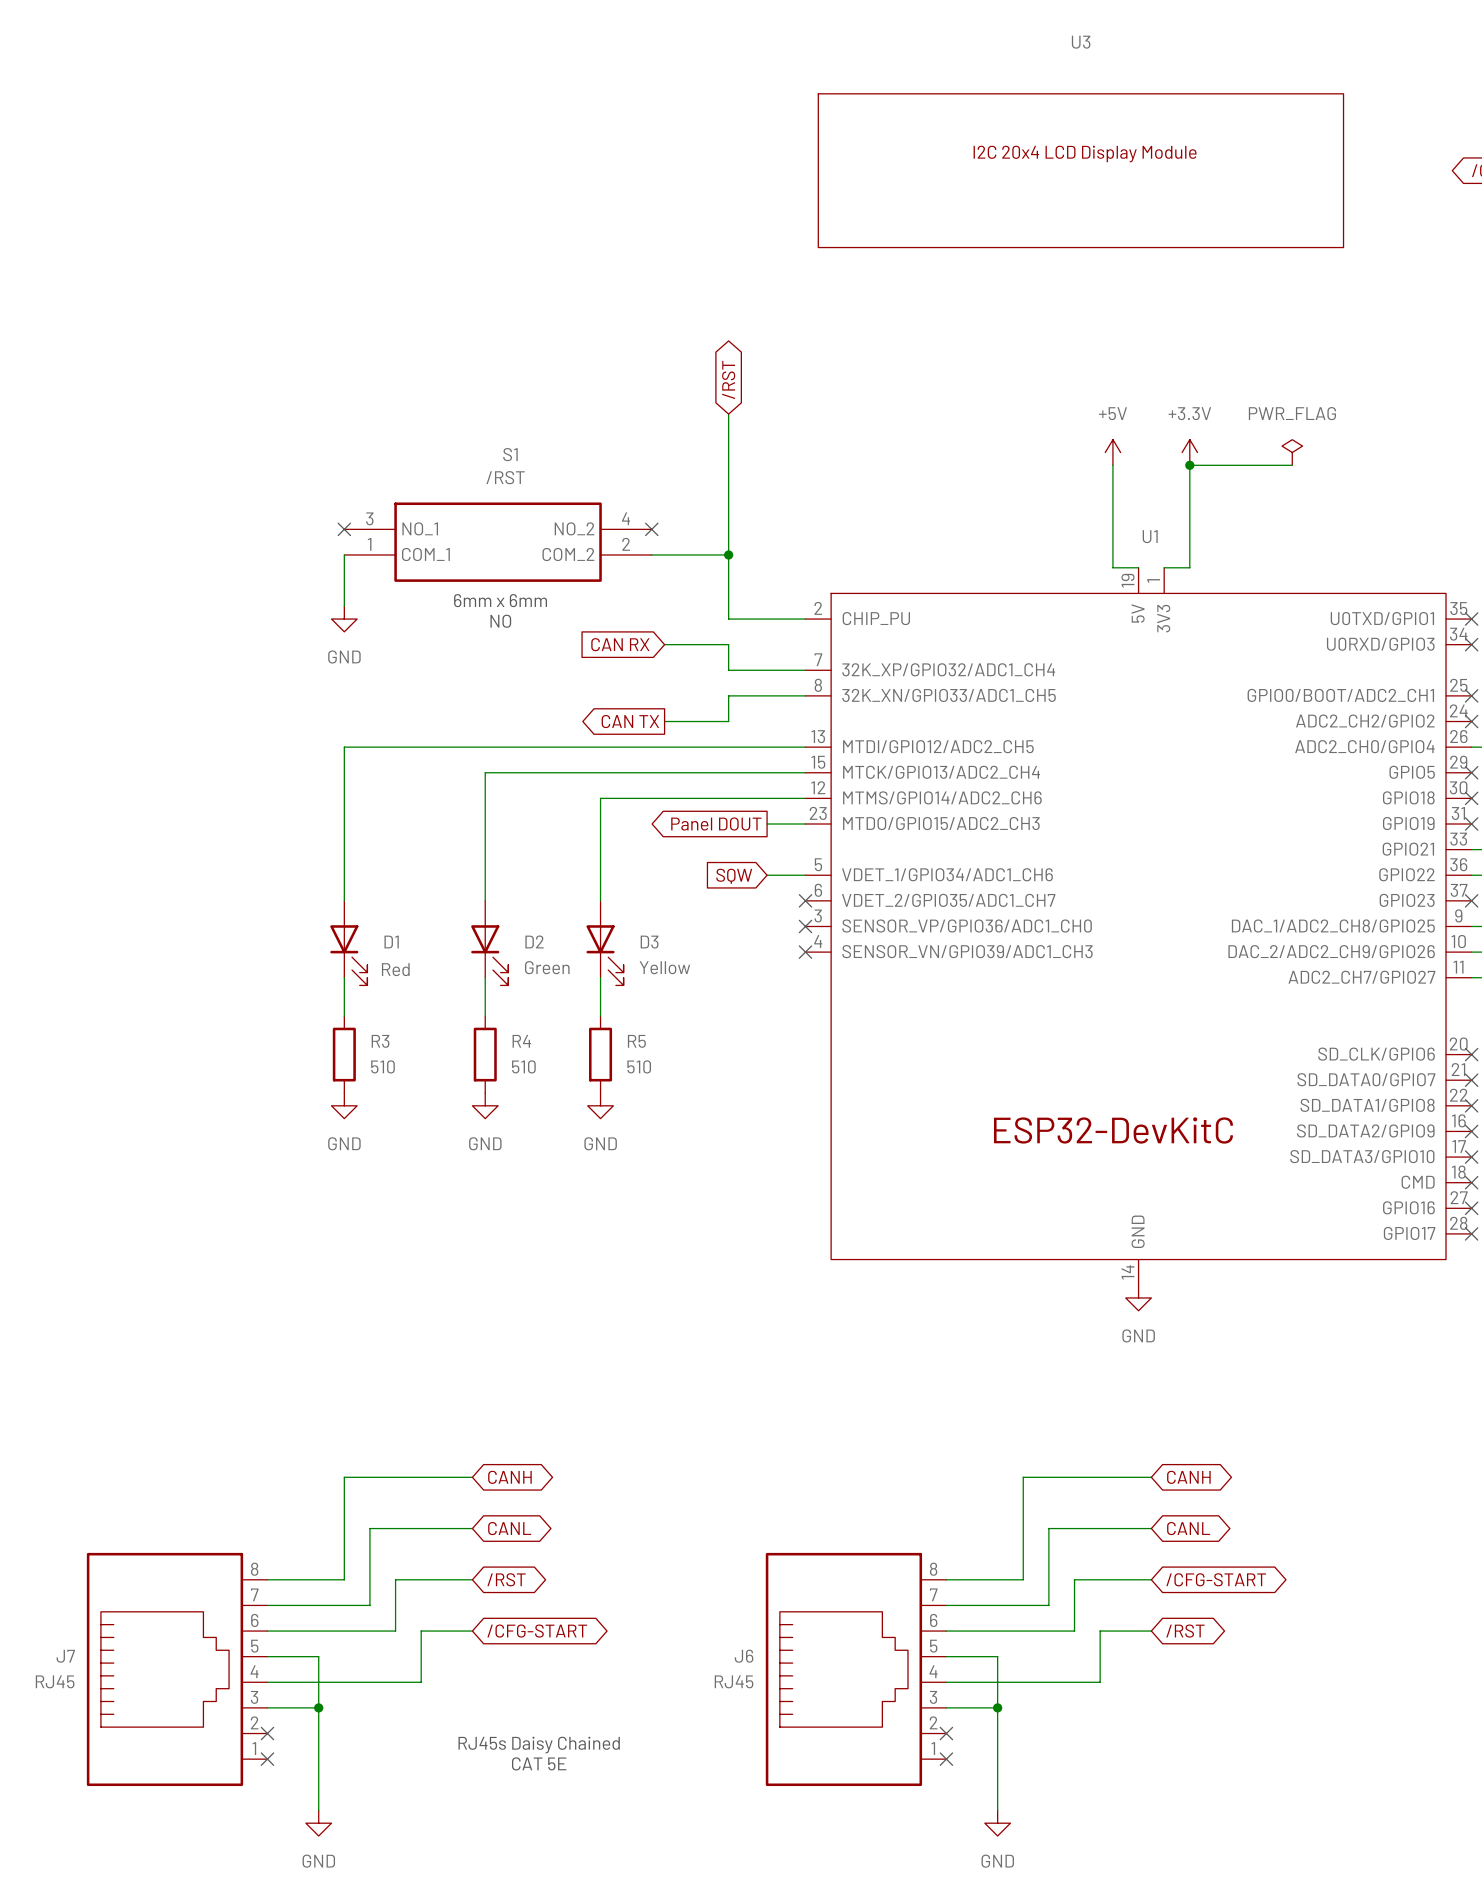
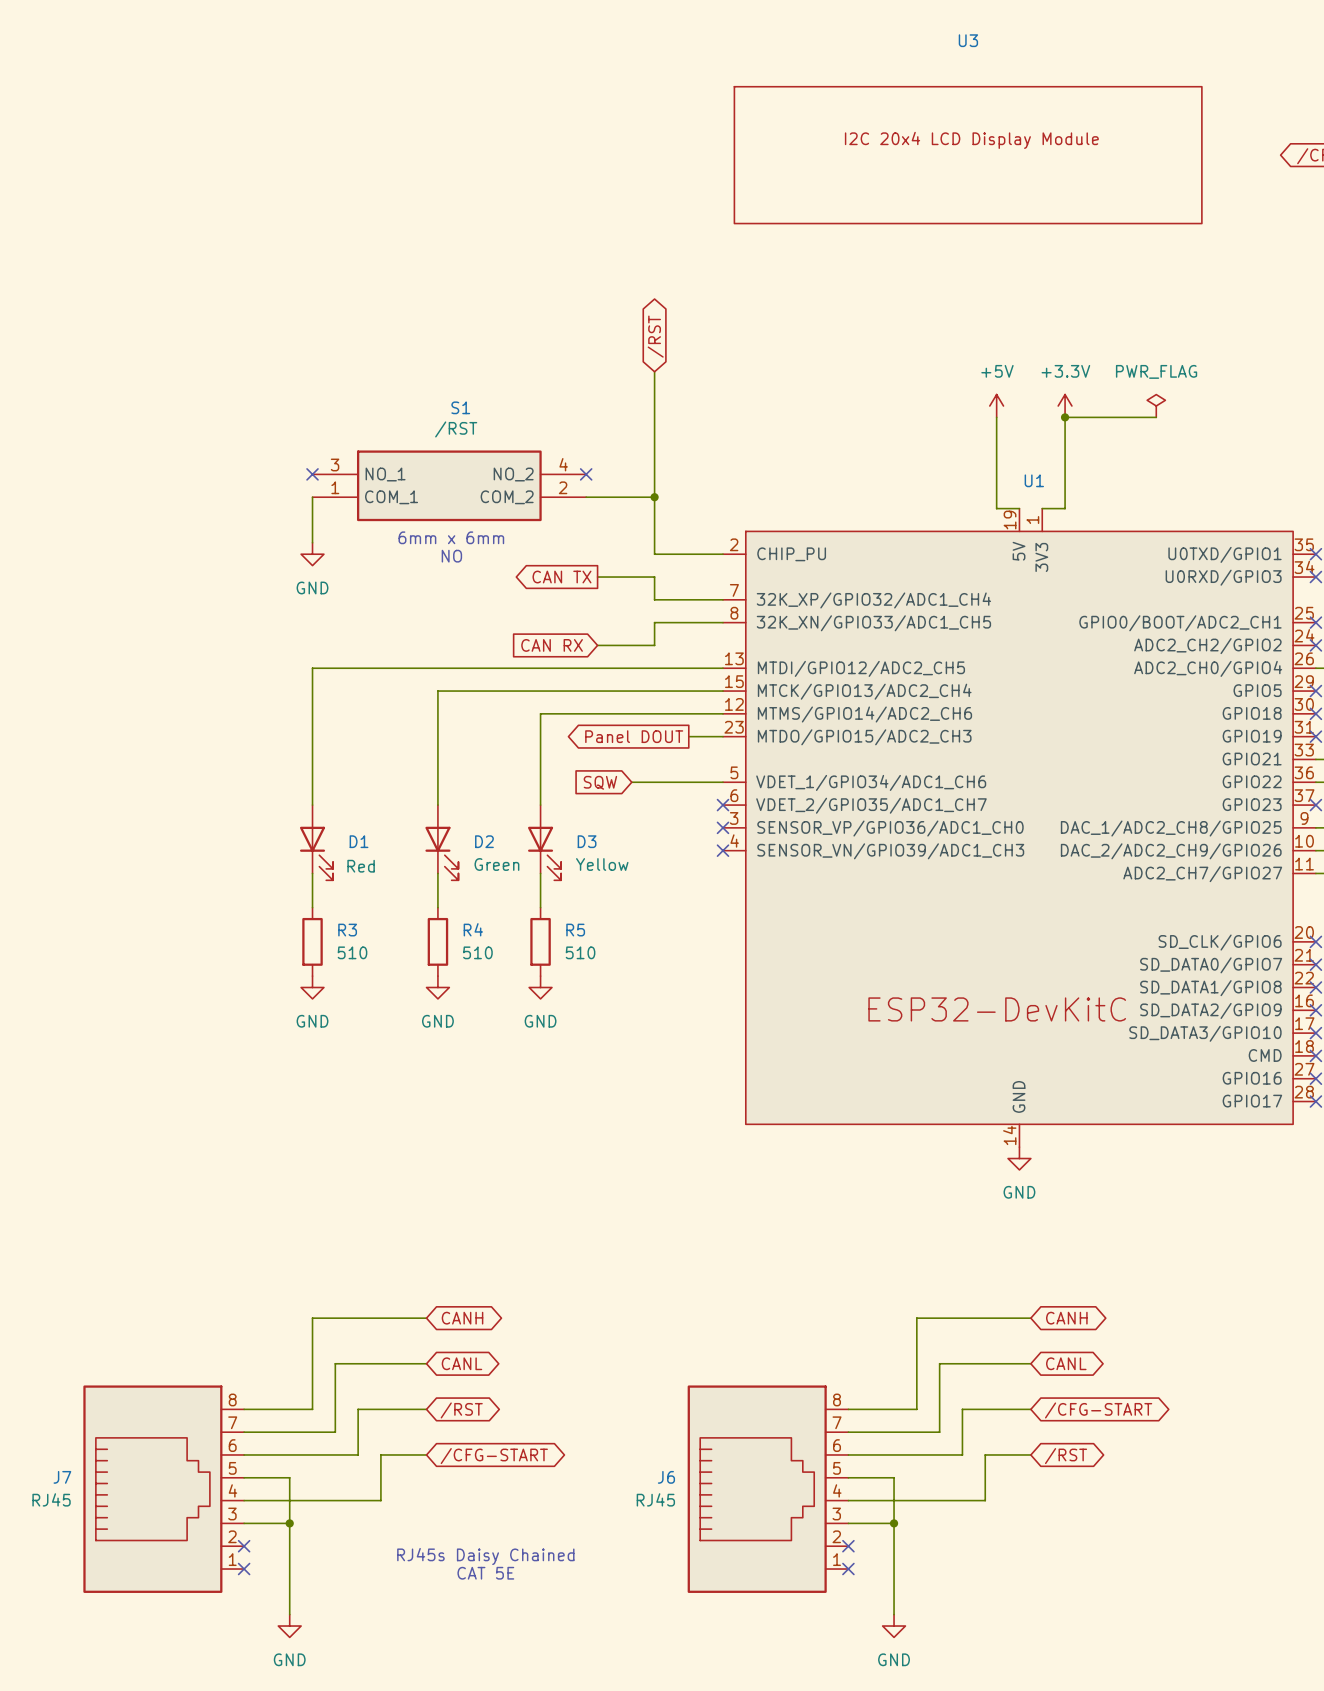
global label shape: input (620, 644) -> output (561, 577)
global label: CAN RX (620, 644) -> CAN TX (561, 577)
global label shape: output (630, 721) -> input (552, 645)
global label: CAN TX (630, 721) -> CAN RX (552, 645)
wire: none -> (631, 782) (688, 782)
global label position: SQW (734, 876) -> SQW (600, 782)

